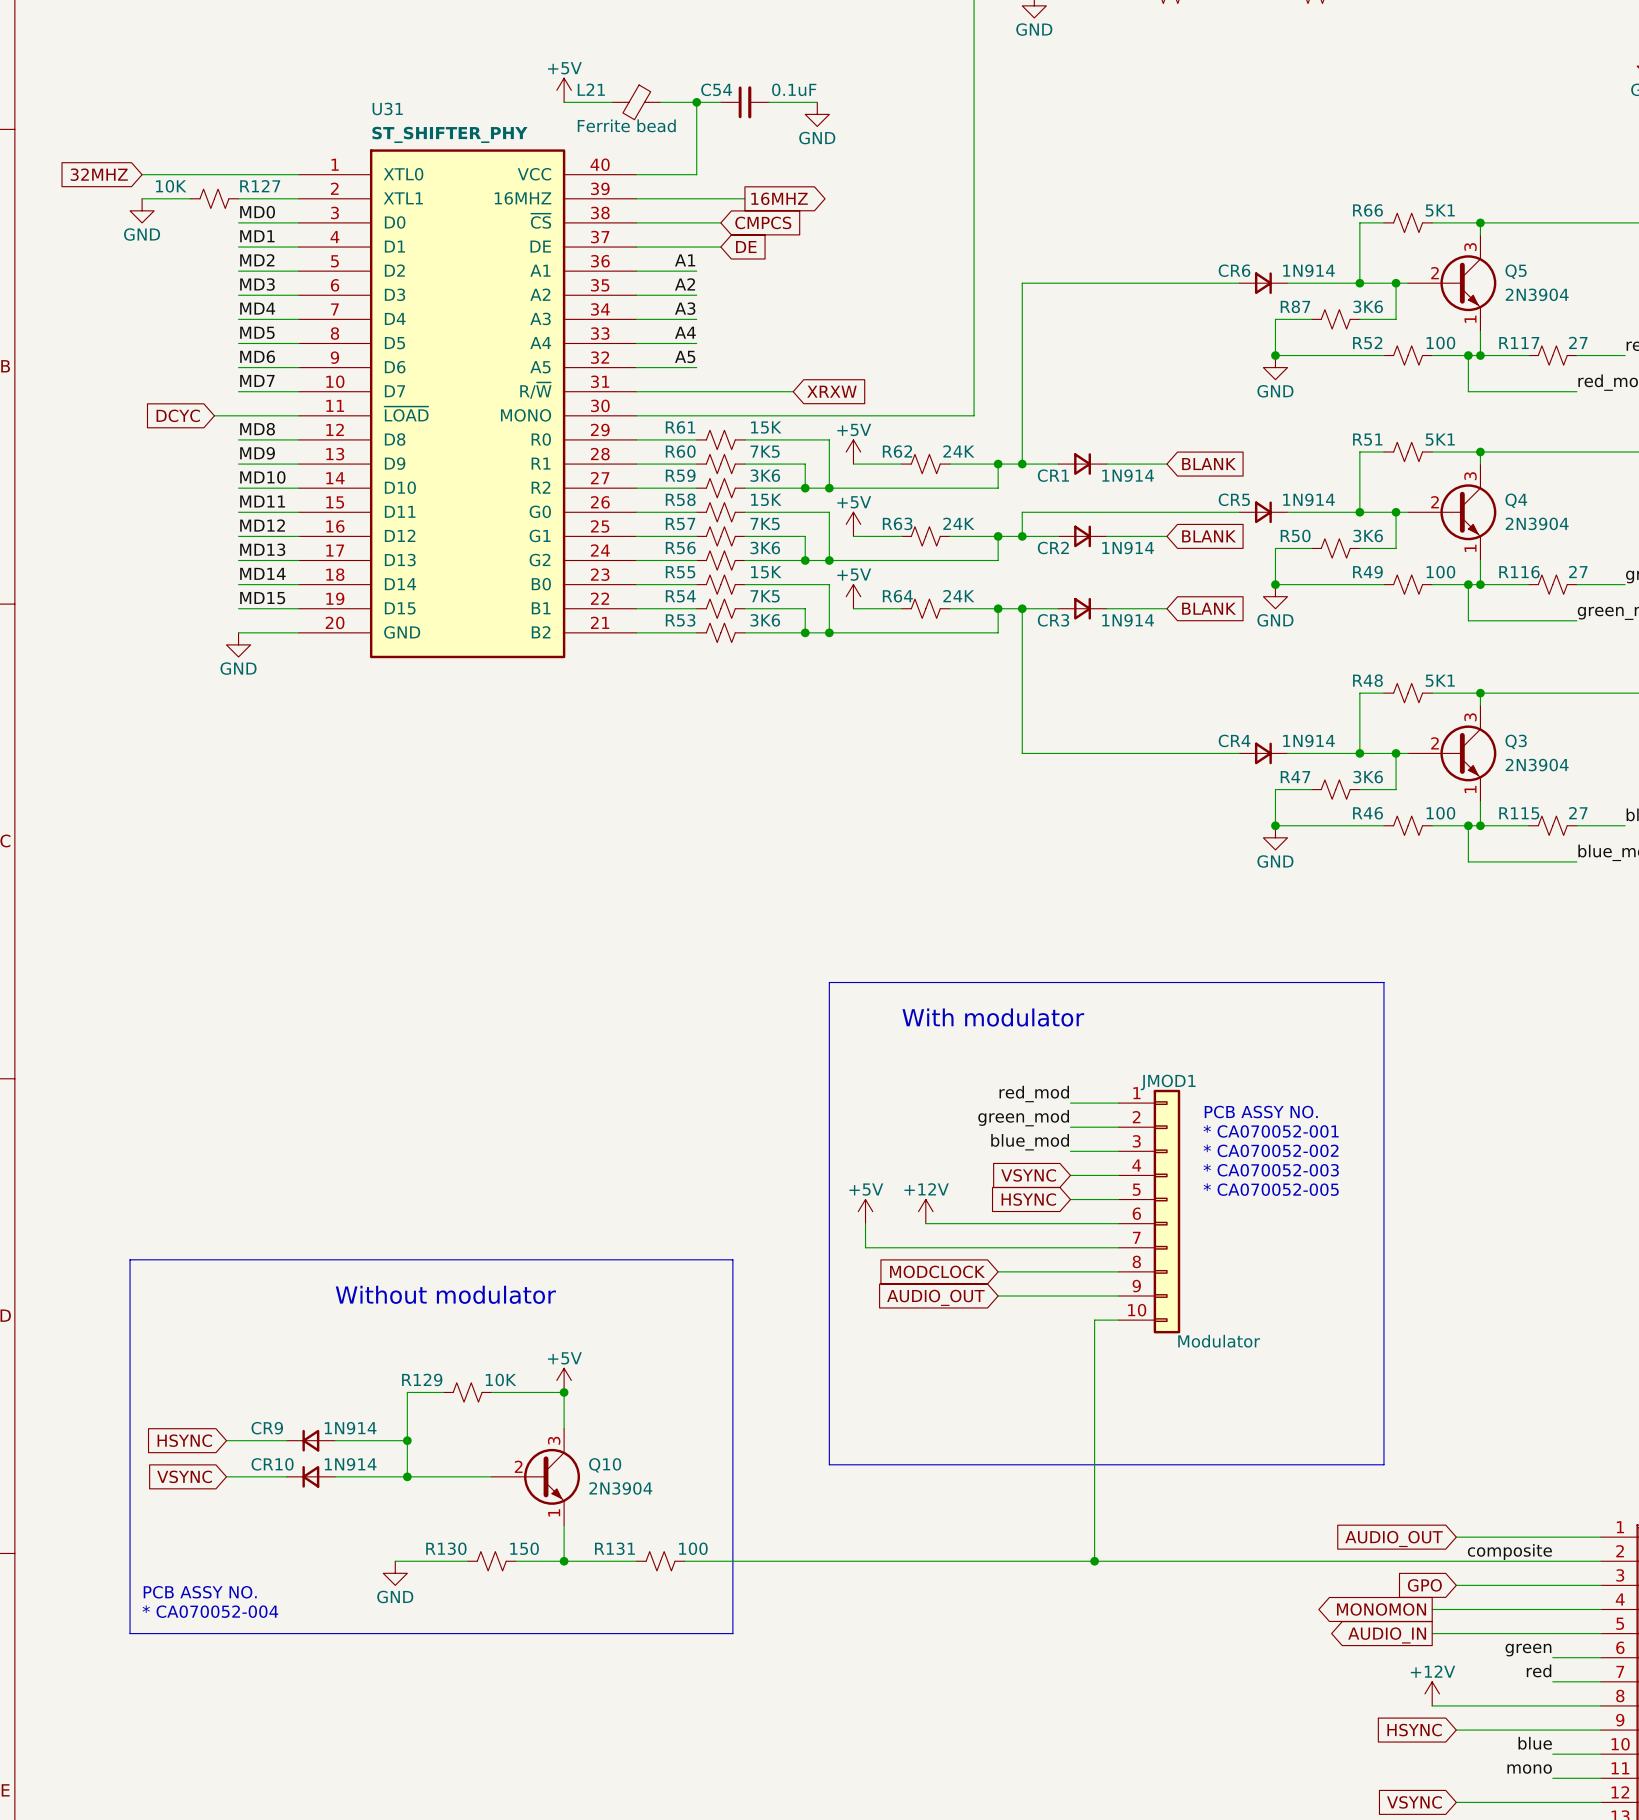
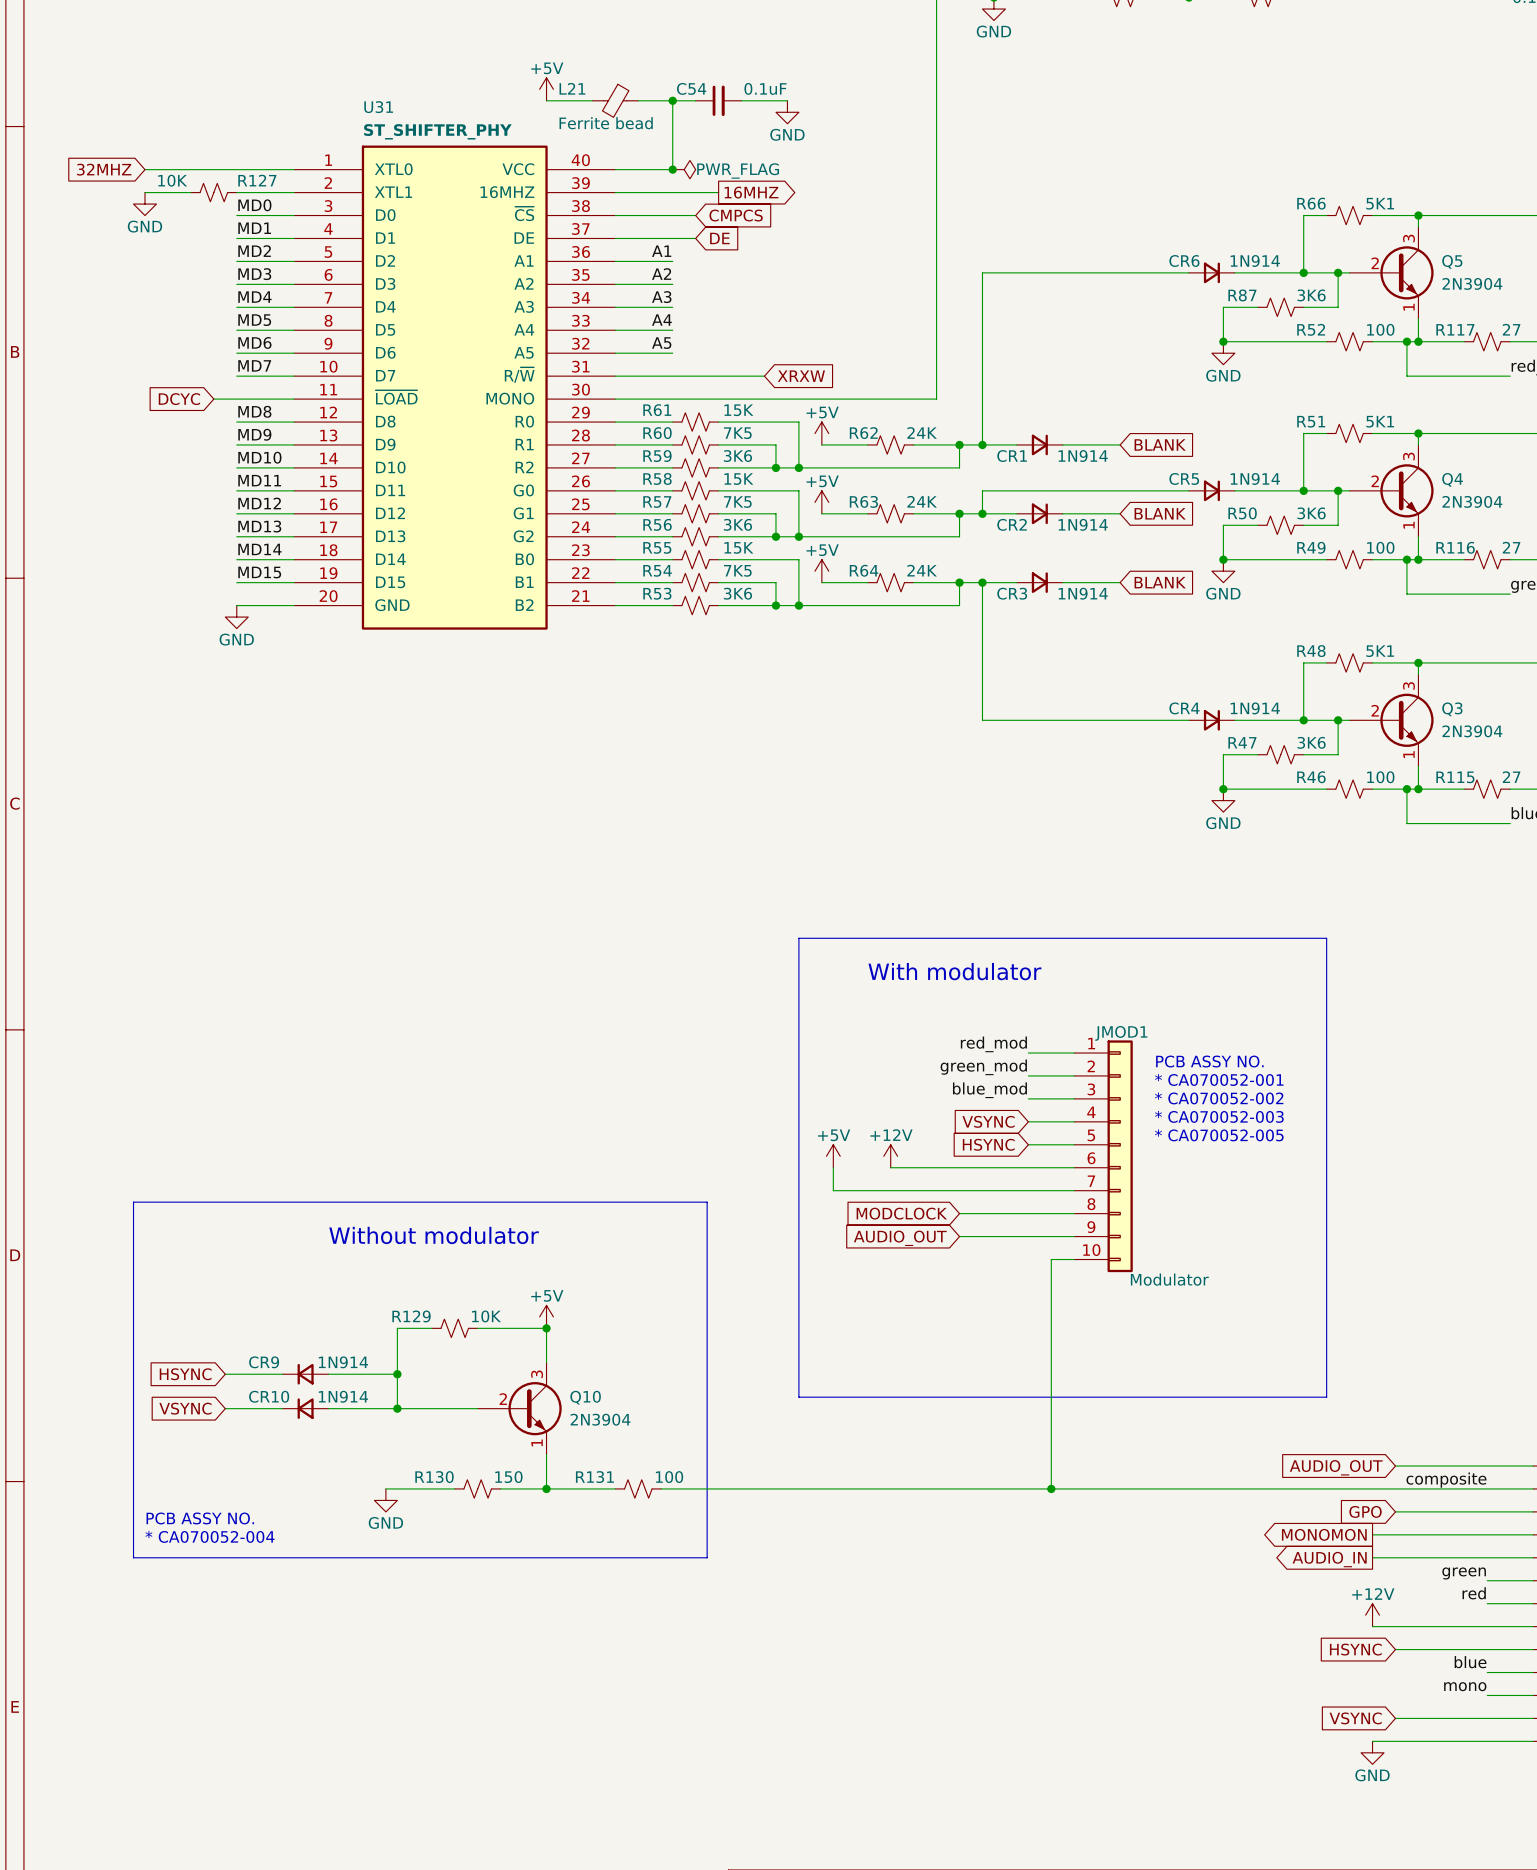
junction: none -> (672, 169)
power symbol: none -> PWR_FLAG (684, 169)

